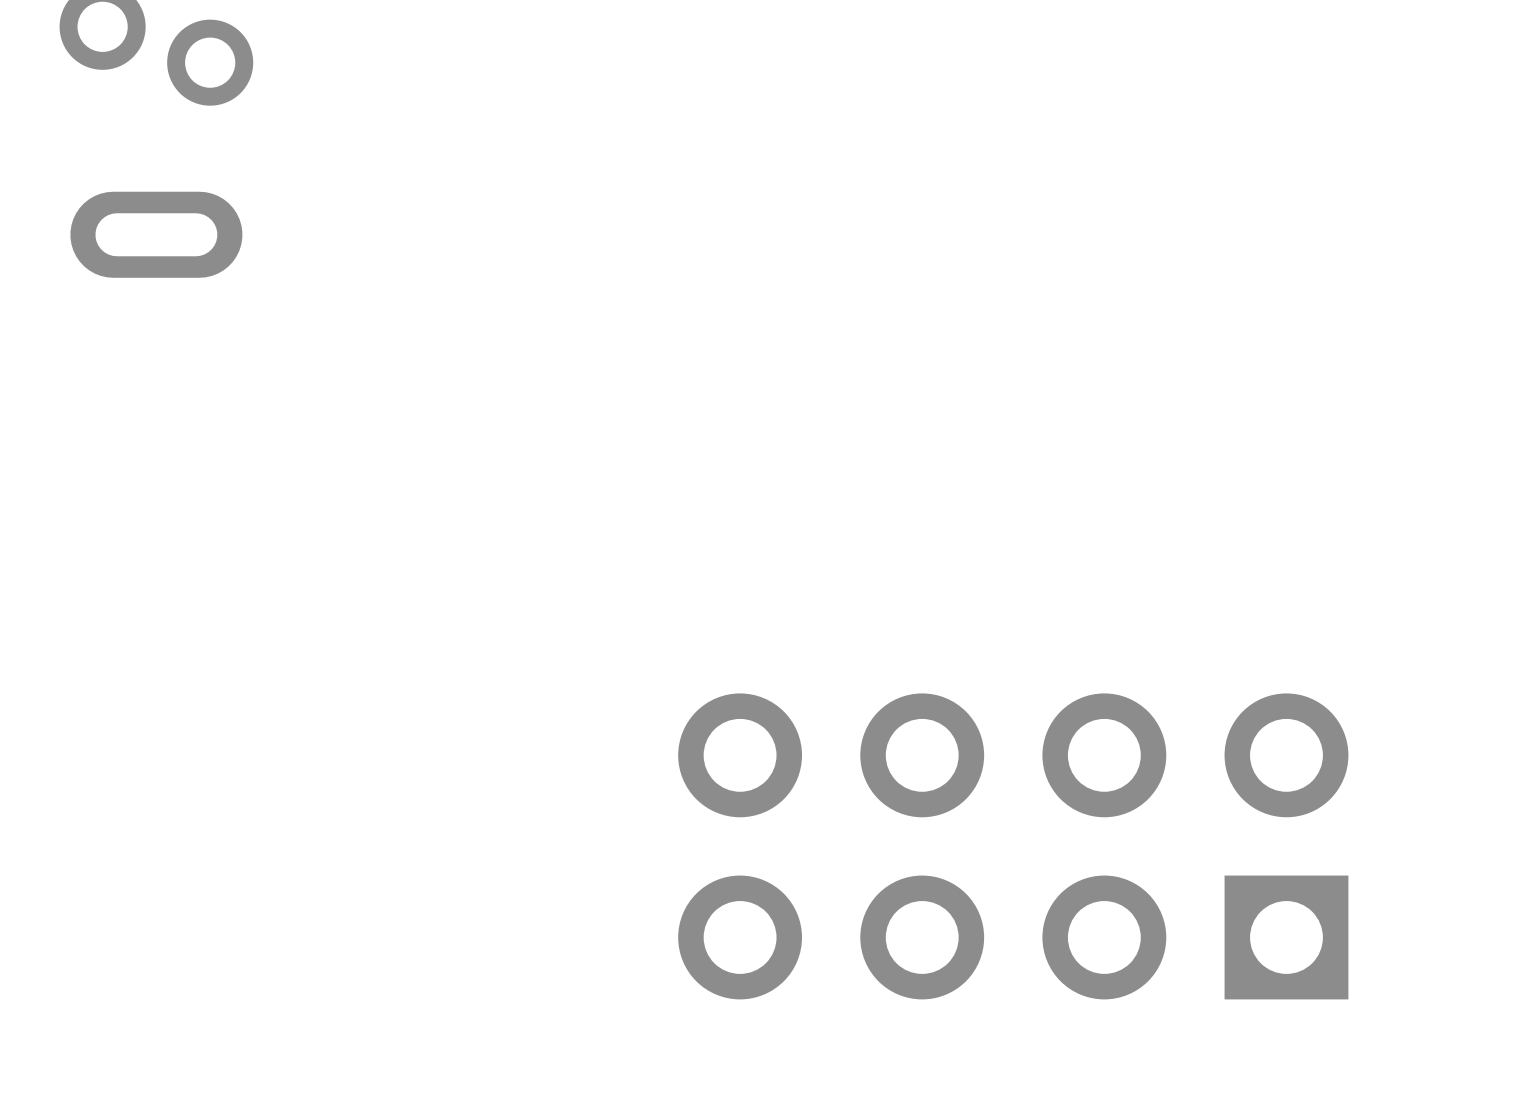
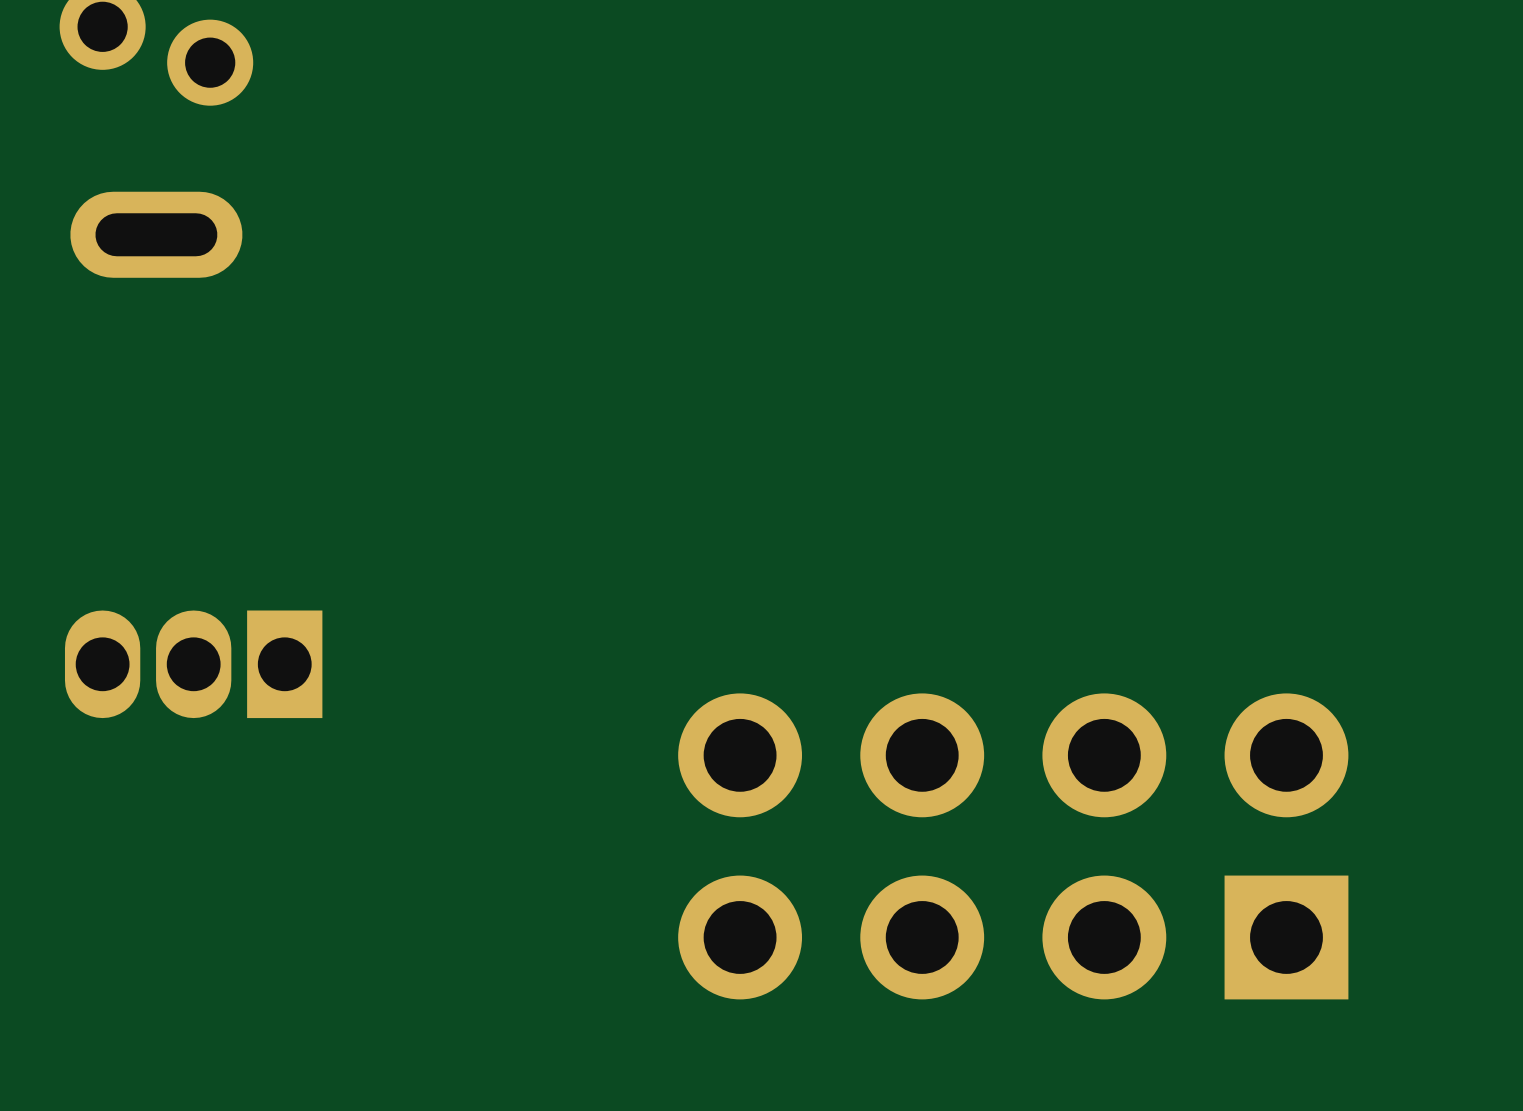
part: none -> (193, 664)

